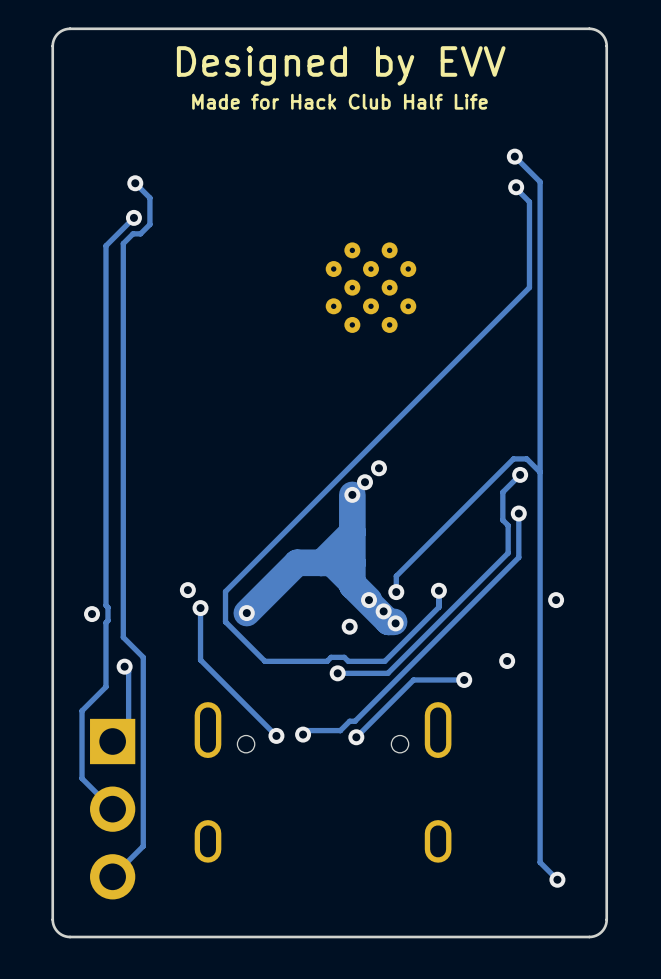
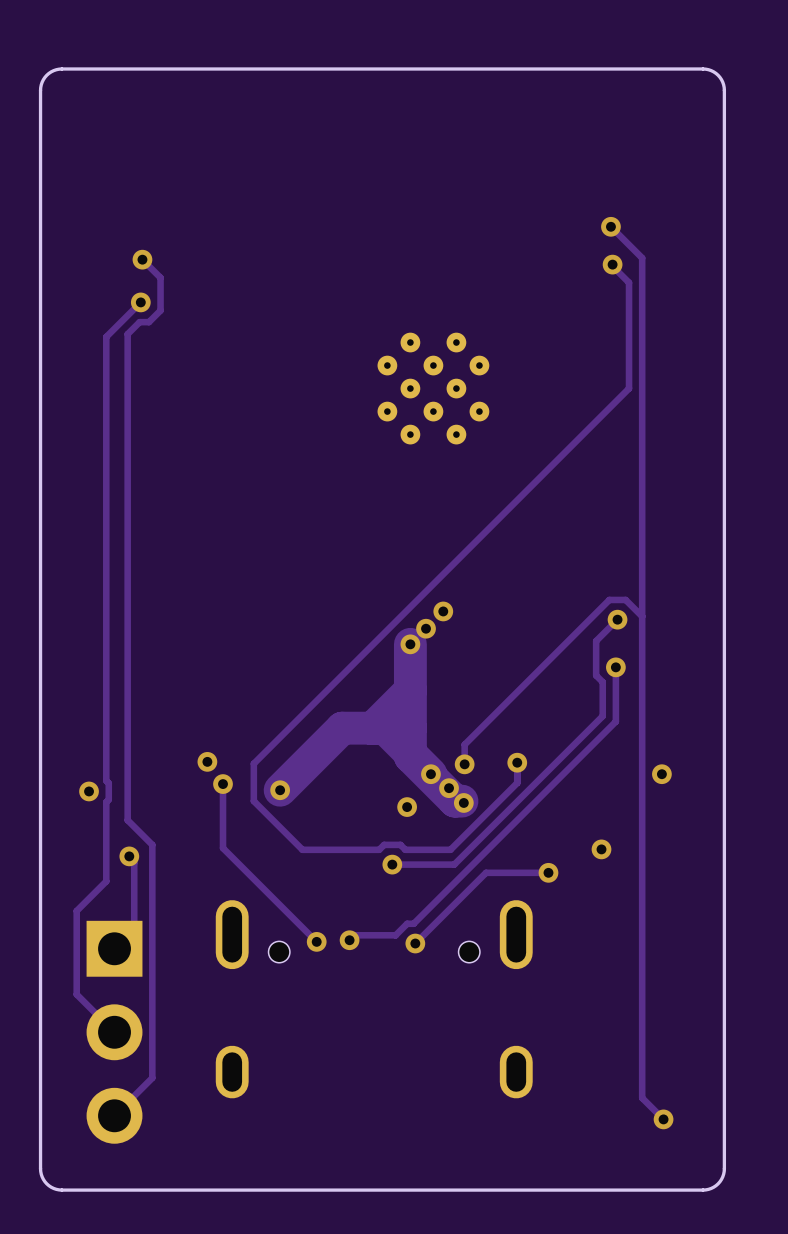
text: Designed by EVV (341, 65) -> none
text: Made for Hack Club Half Life (339, 101) -> none

